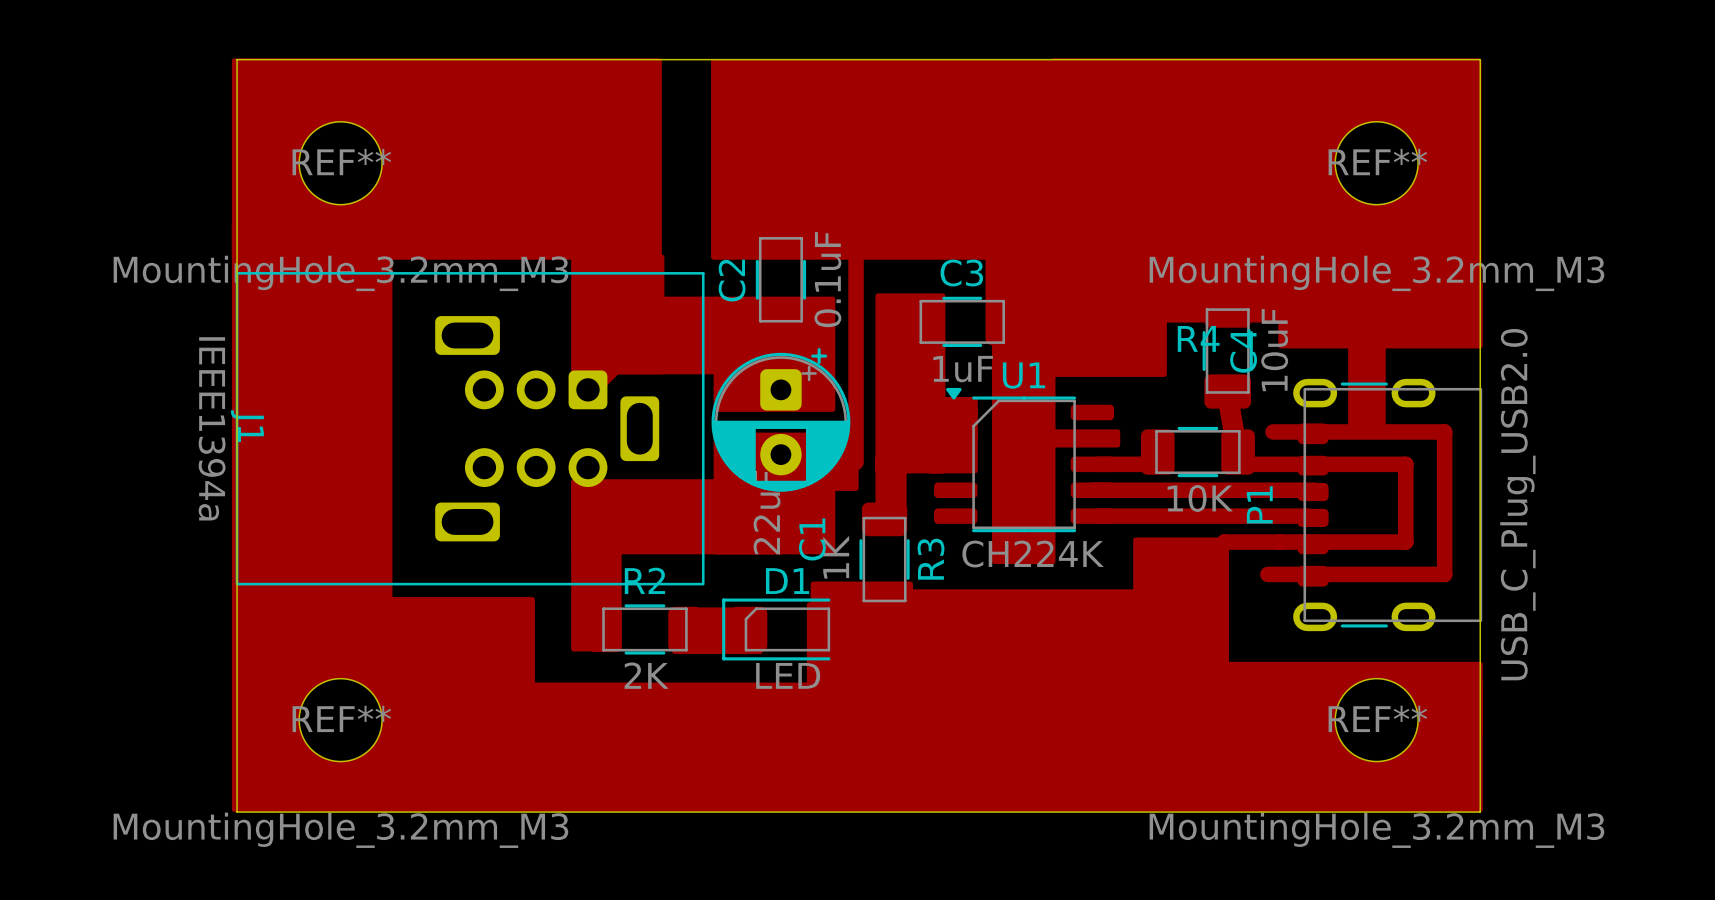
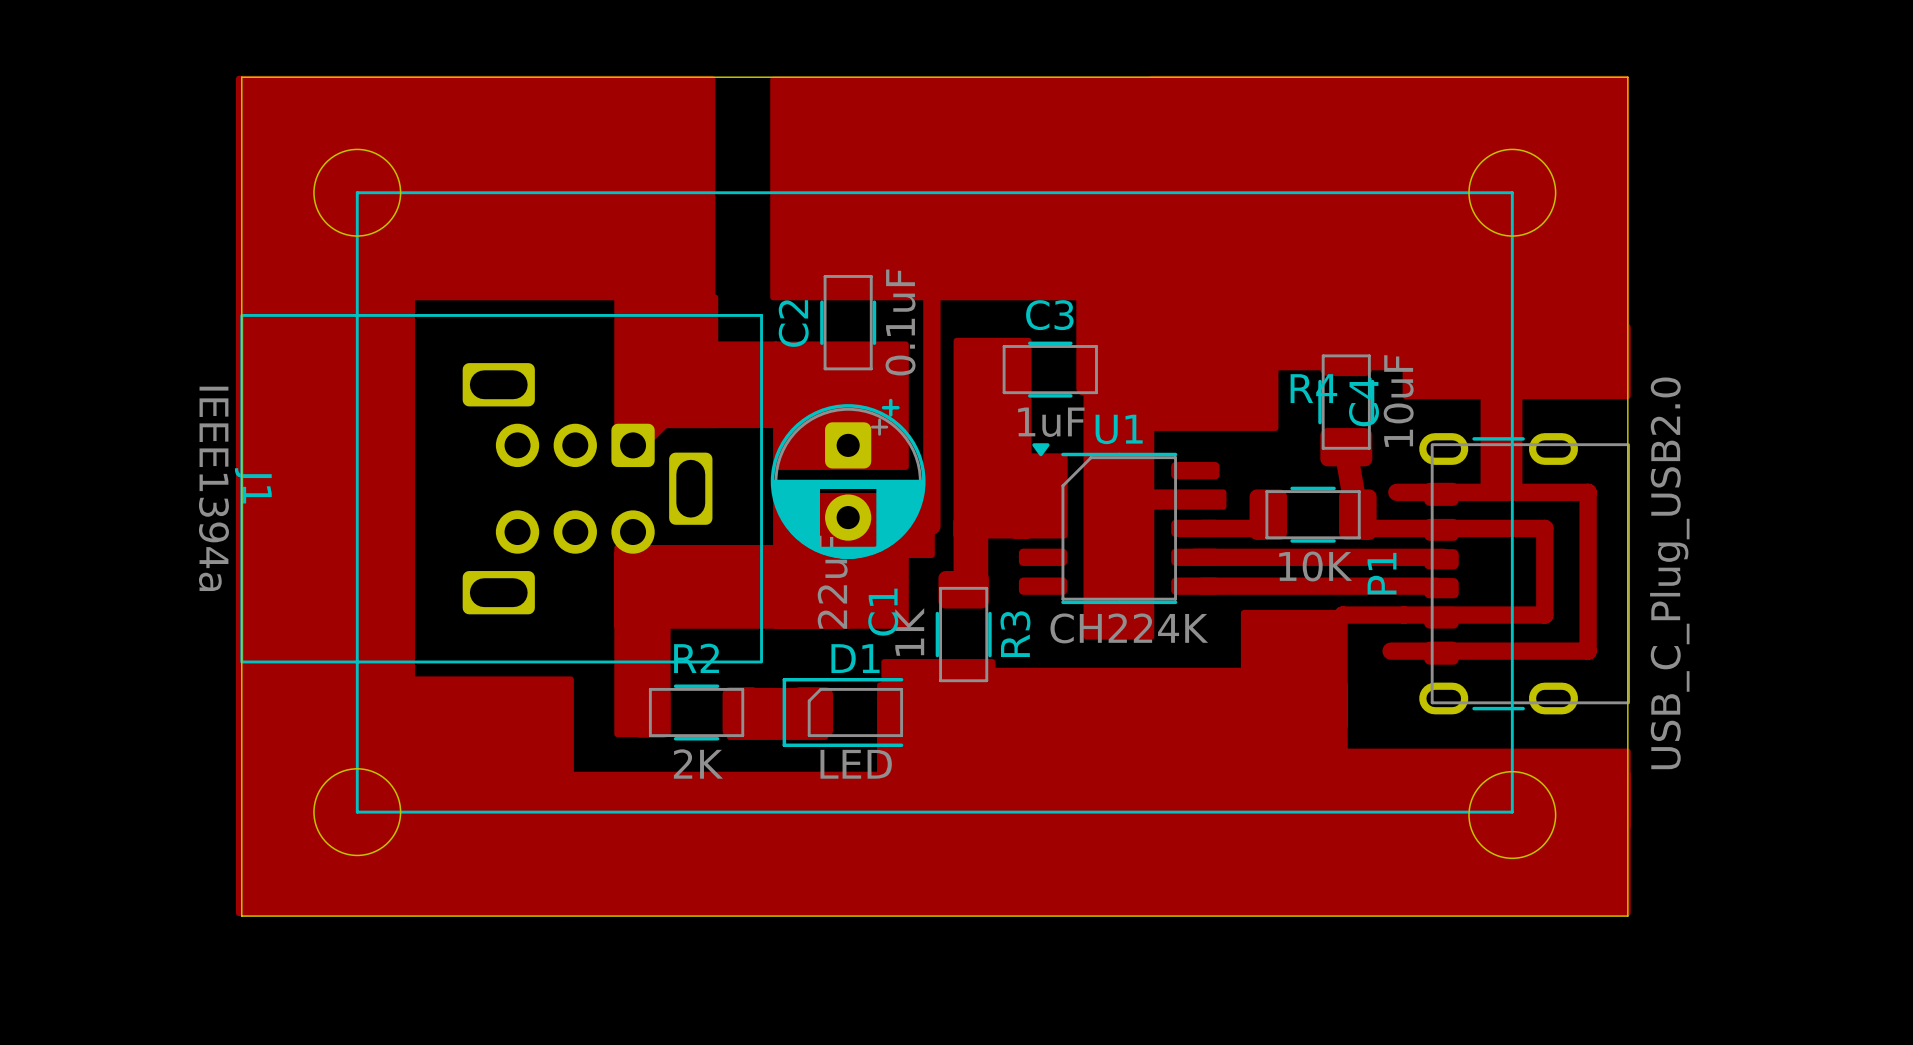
round board edge: none -> [313, 148, 402, 237]
round board edge: none -> [1468, 148, 1557, 237]
line: none -> (357, 192) (1512, 192) (1512, 812) (357, 812) (357, 192)
REF**: MountingHole_3.2mm_M3 (340, 163) -> none
REF**: MountingHole_3.2mm_M3 (1376, 163) -> none
round board edge: none -> [313, 768, 402, 857]
round board edge: none -> [1468, 770, 1557, 860]
REF**: MountingHole_3.2mm_M3 (340, 720) -> none
REF**: MountingHole_3.2mm_M3 (1376, 720) -> none

